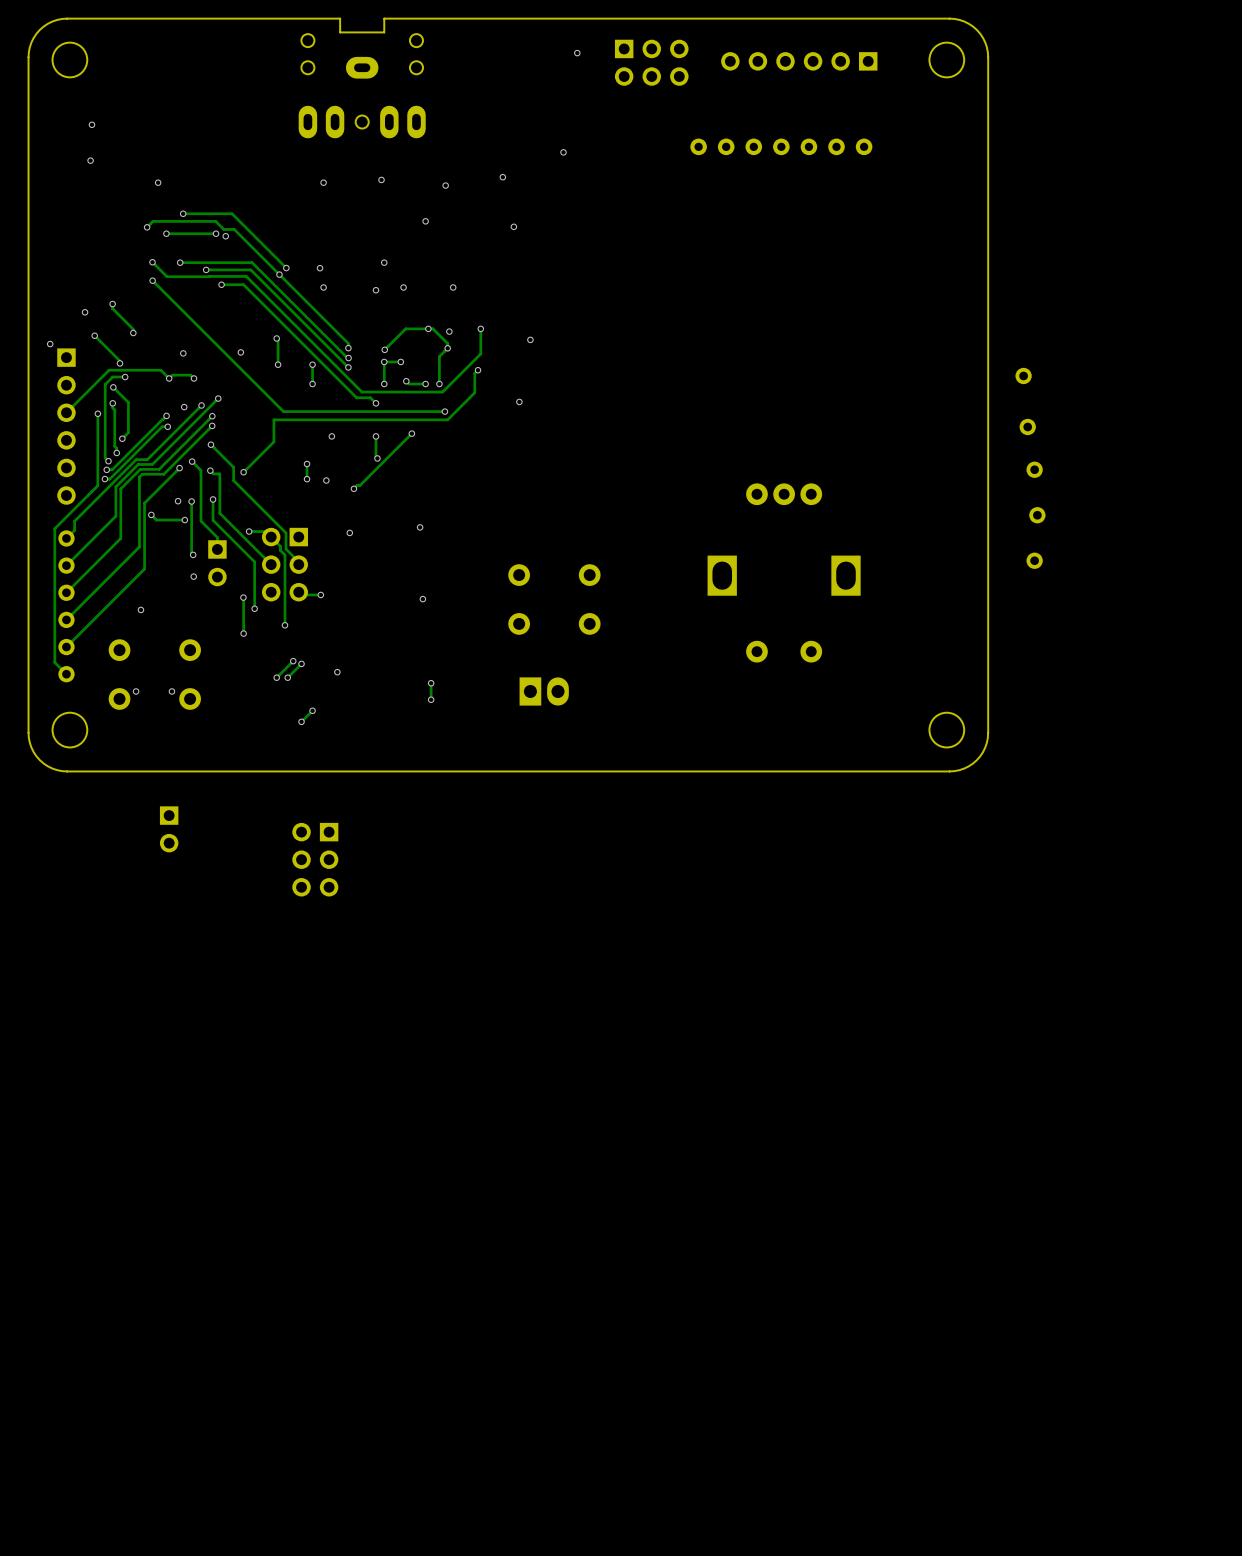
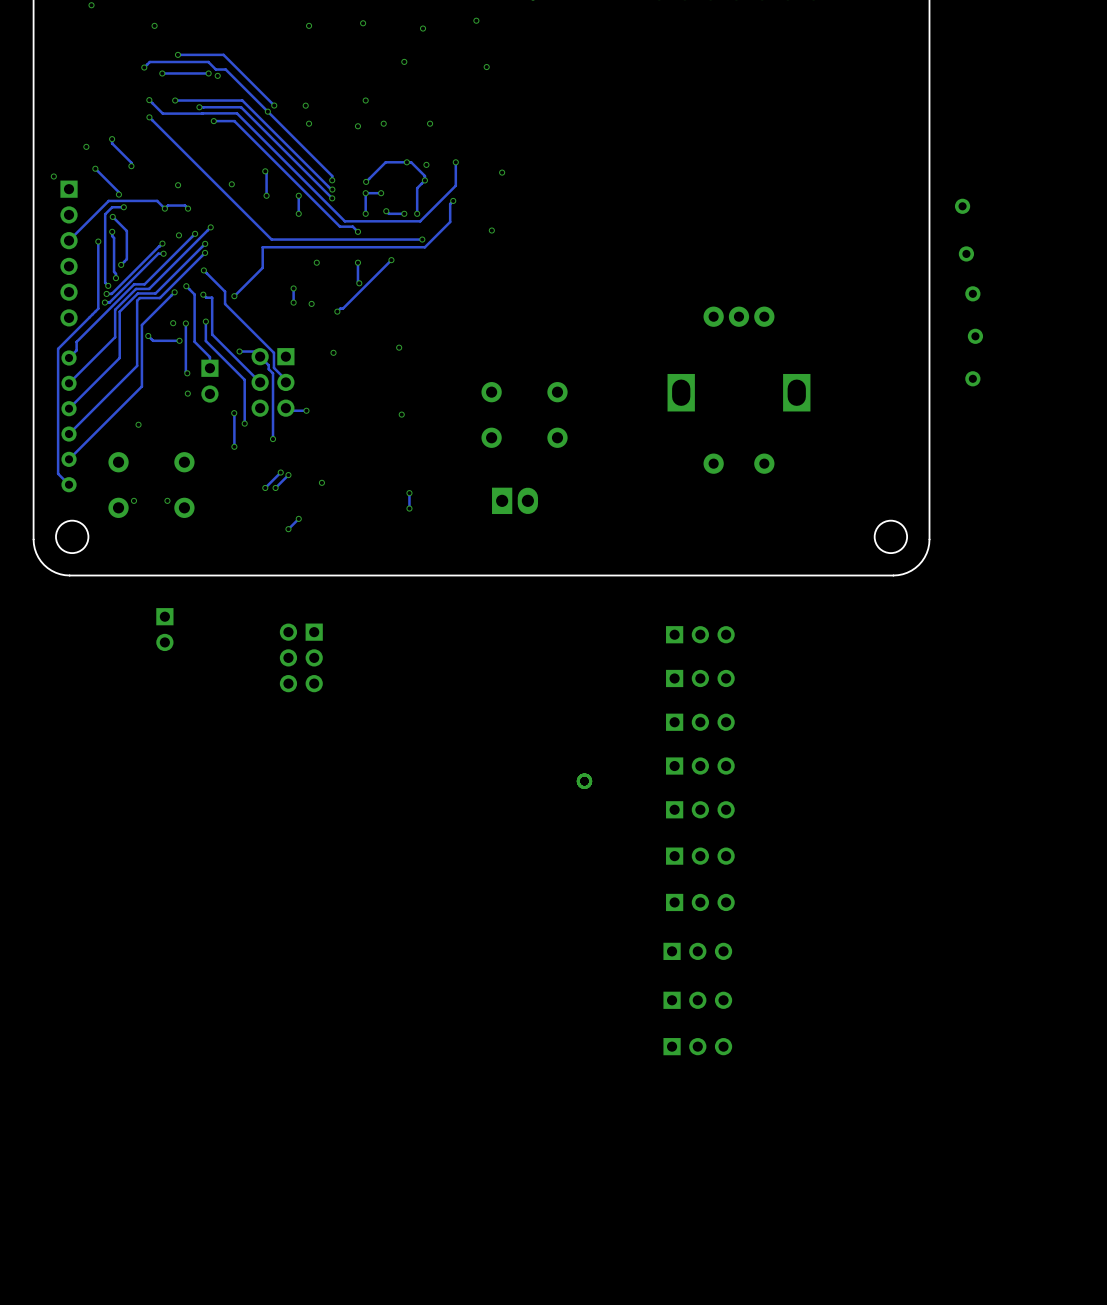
part: none -> (700, 634)
part: none -> (700, 678)
part: none -> (700, 722)
part: none -> (700, 766)
part: none -> (584, 781)
part: none -> (700, 809)
part: none -> (700, 856)
part: none -> (700, 902)
part: none -> (697, 951)
part: none -> (697, 1000)
part: none -> (697, 1046)

